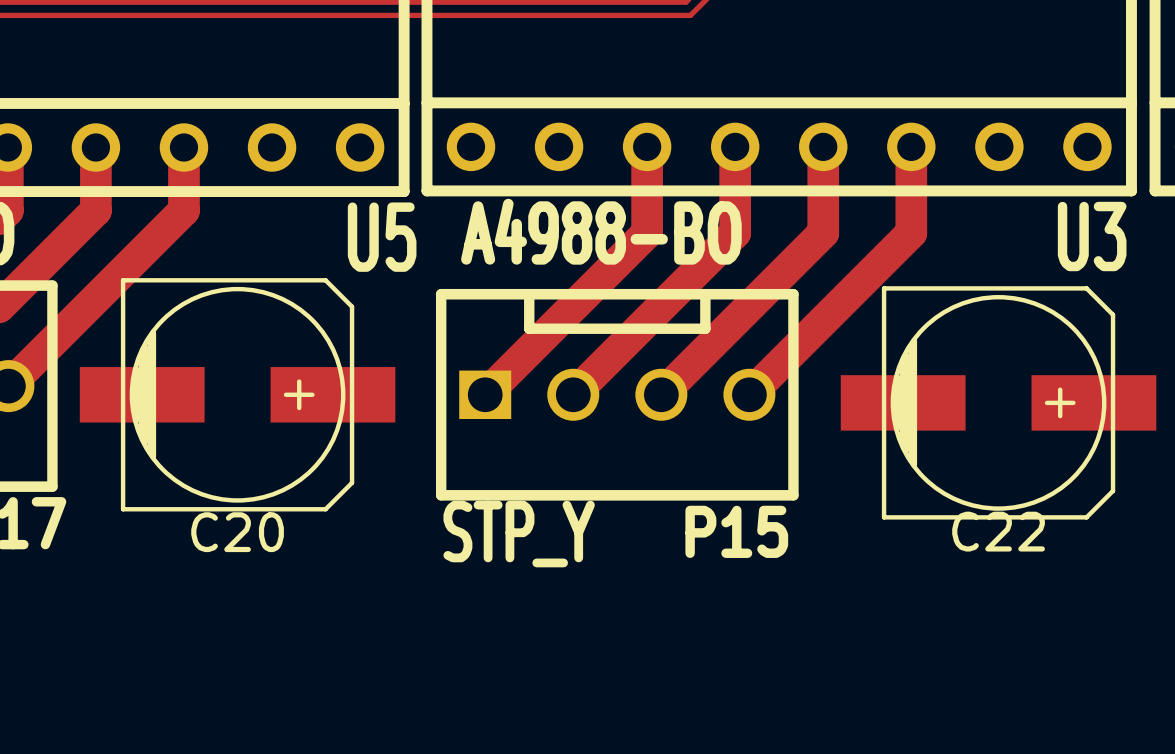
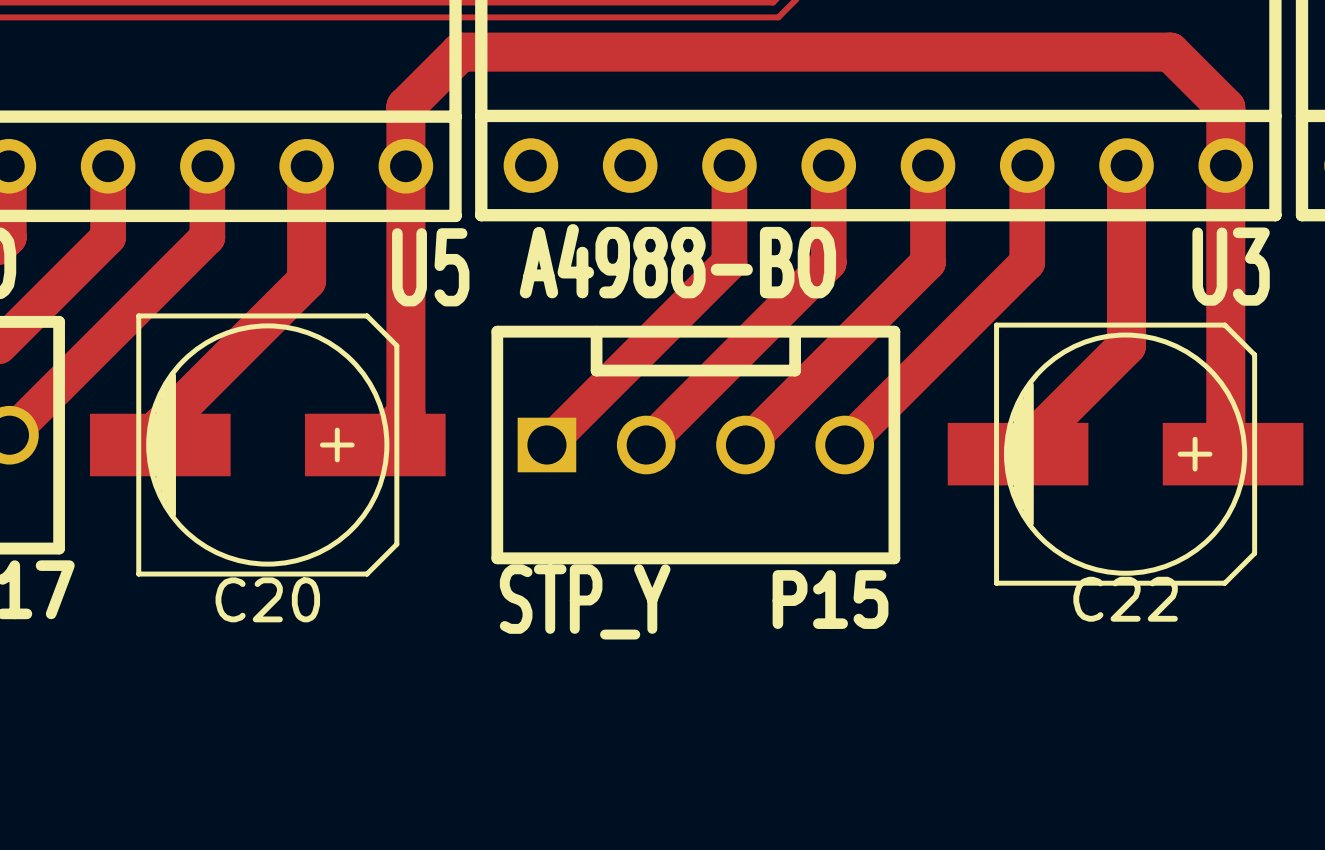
track: none -> (1126, 165) (1126, 345) (1018, 454)
track: none -> (306, 166) (306, 280) (160, 426) (160, 445)
track: none -> (375, 445) (405, 414) (405, 106) (460, 52) (1170, 52) (1225, 107) (1225, 446) (1233, 454)

